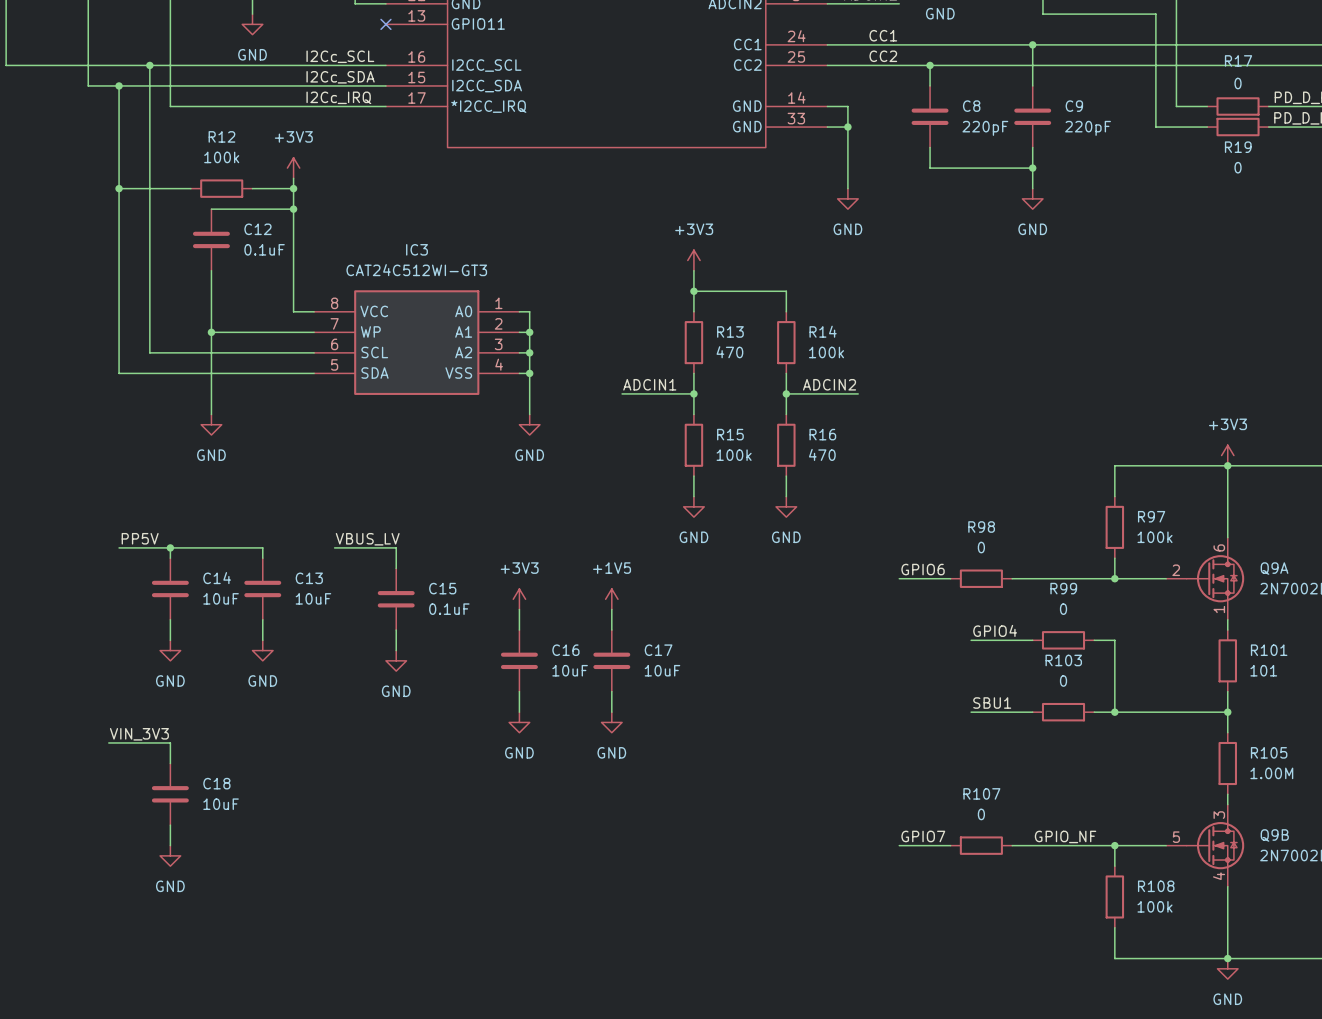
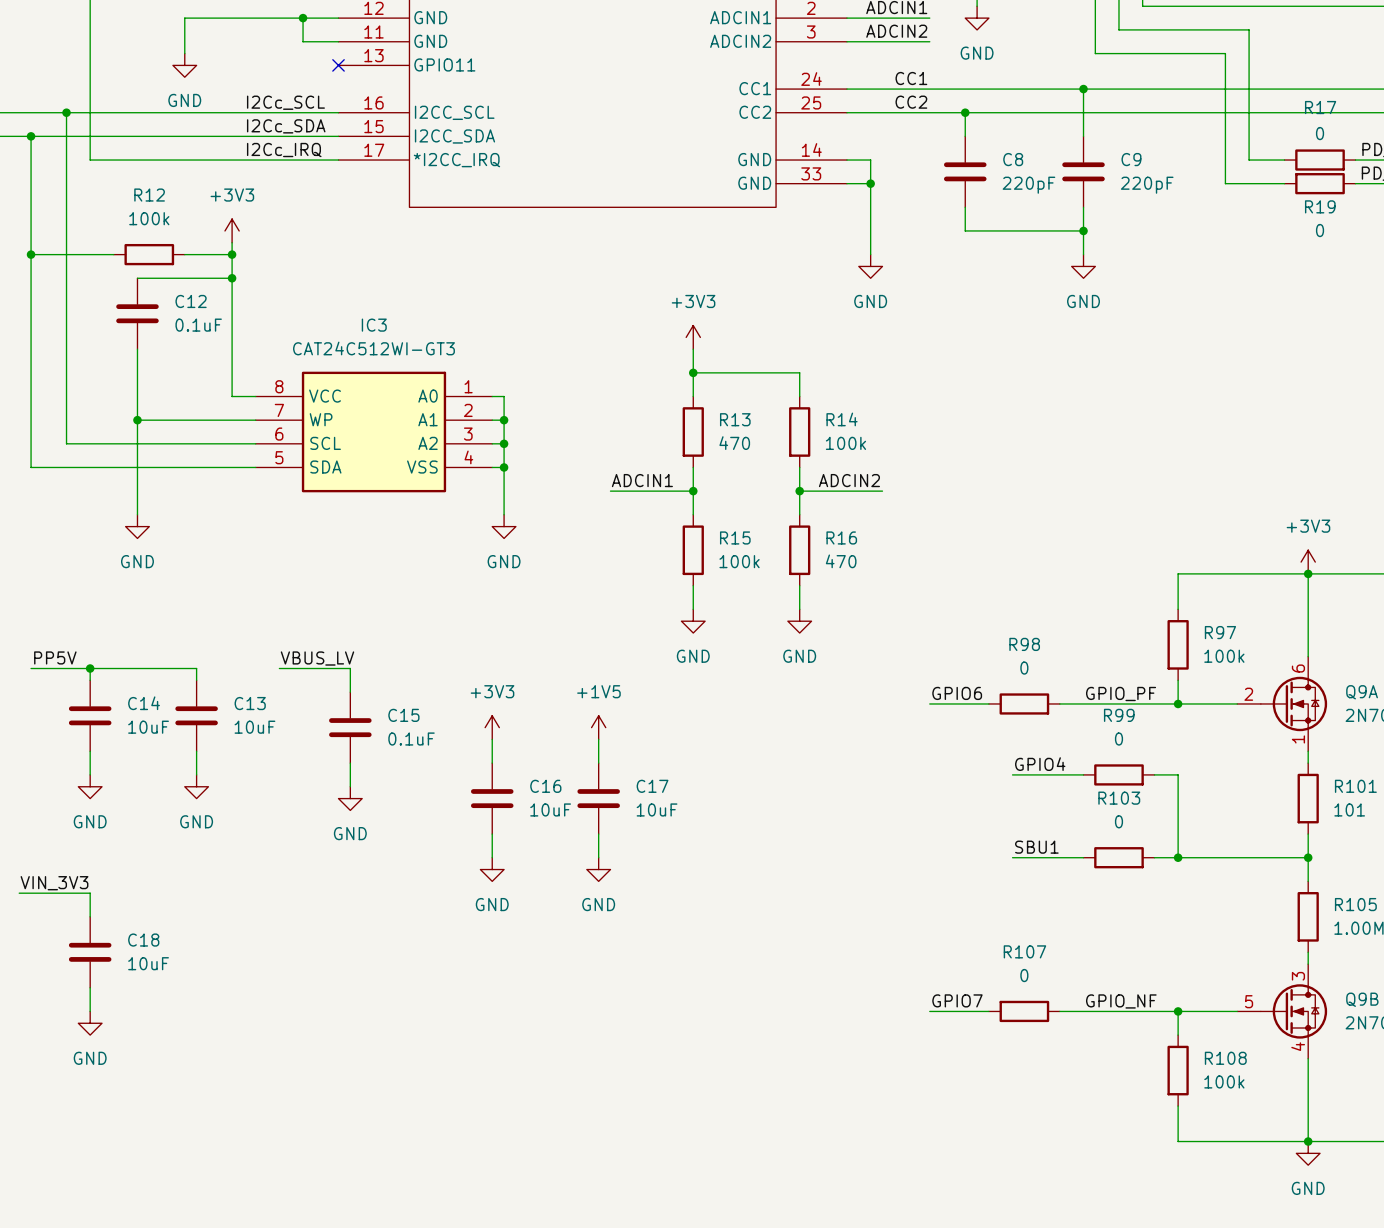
label: none -> GPIO_PF (1121, 693)

